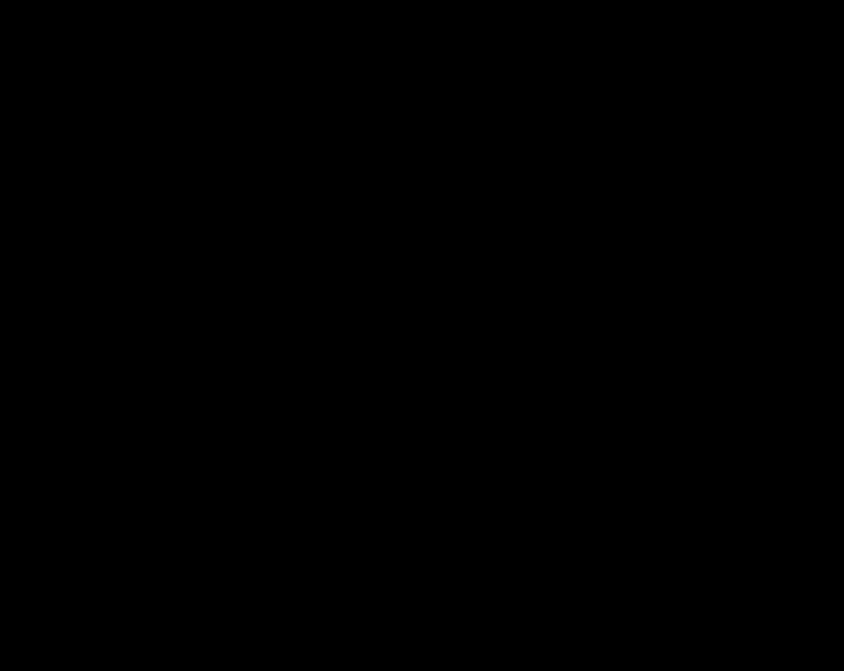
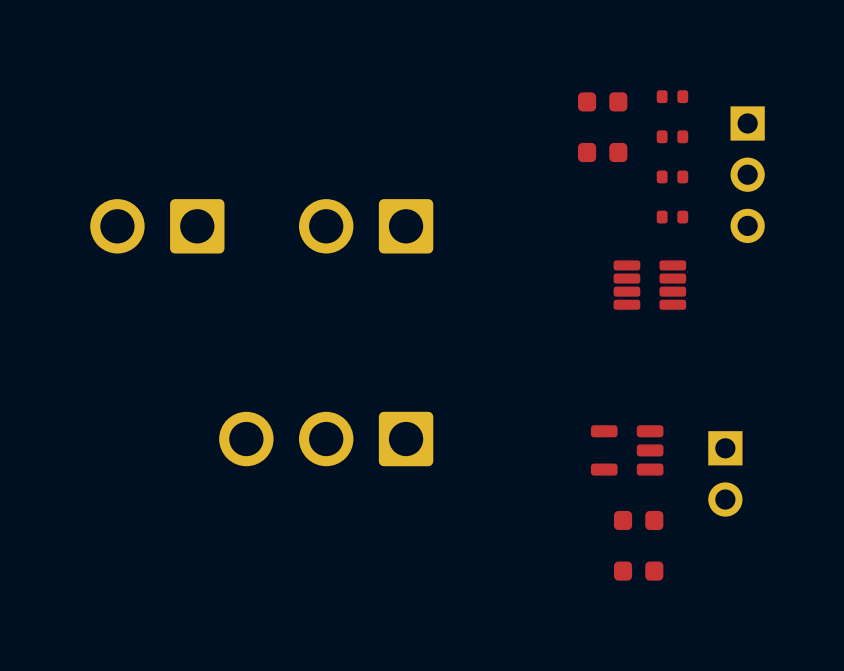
part: none -> (672, 96)
part: none -> (602, 101)
part: none -> (672, 136)
part: none -> (602, 152)
part: none -> (747, 174)
part: none -> (672, 176)
part: none -> (672, 217)
part: none -> (157, 226)
part: none -> (366, 226)
part: none -> (649, 285)
part: none -> (326, 439)
part: none -> (627, 450)
part: none -> (725, 473)
part: none -> (638, 520)
part: none -> (638, 571)

